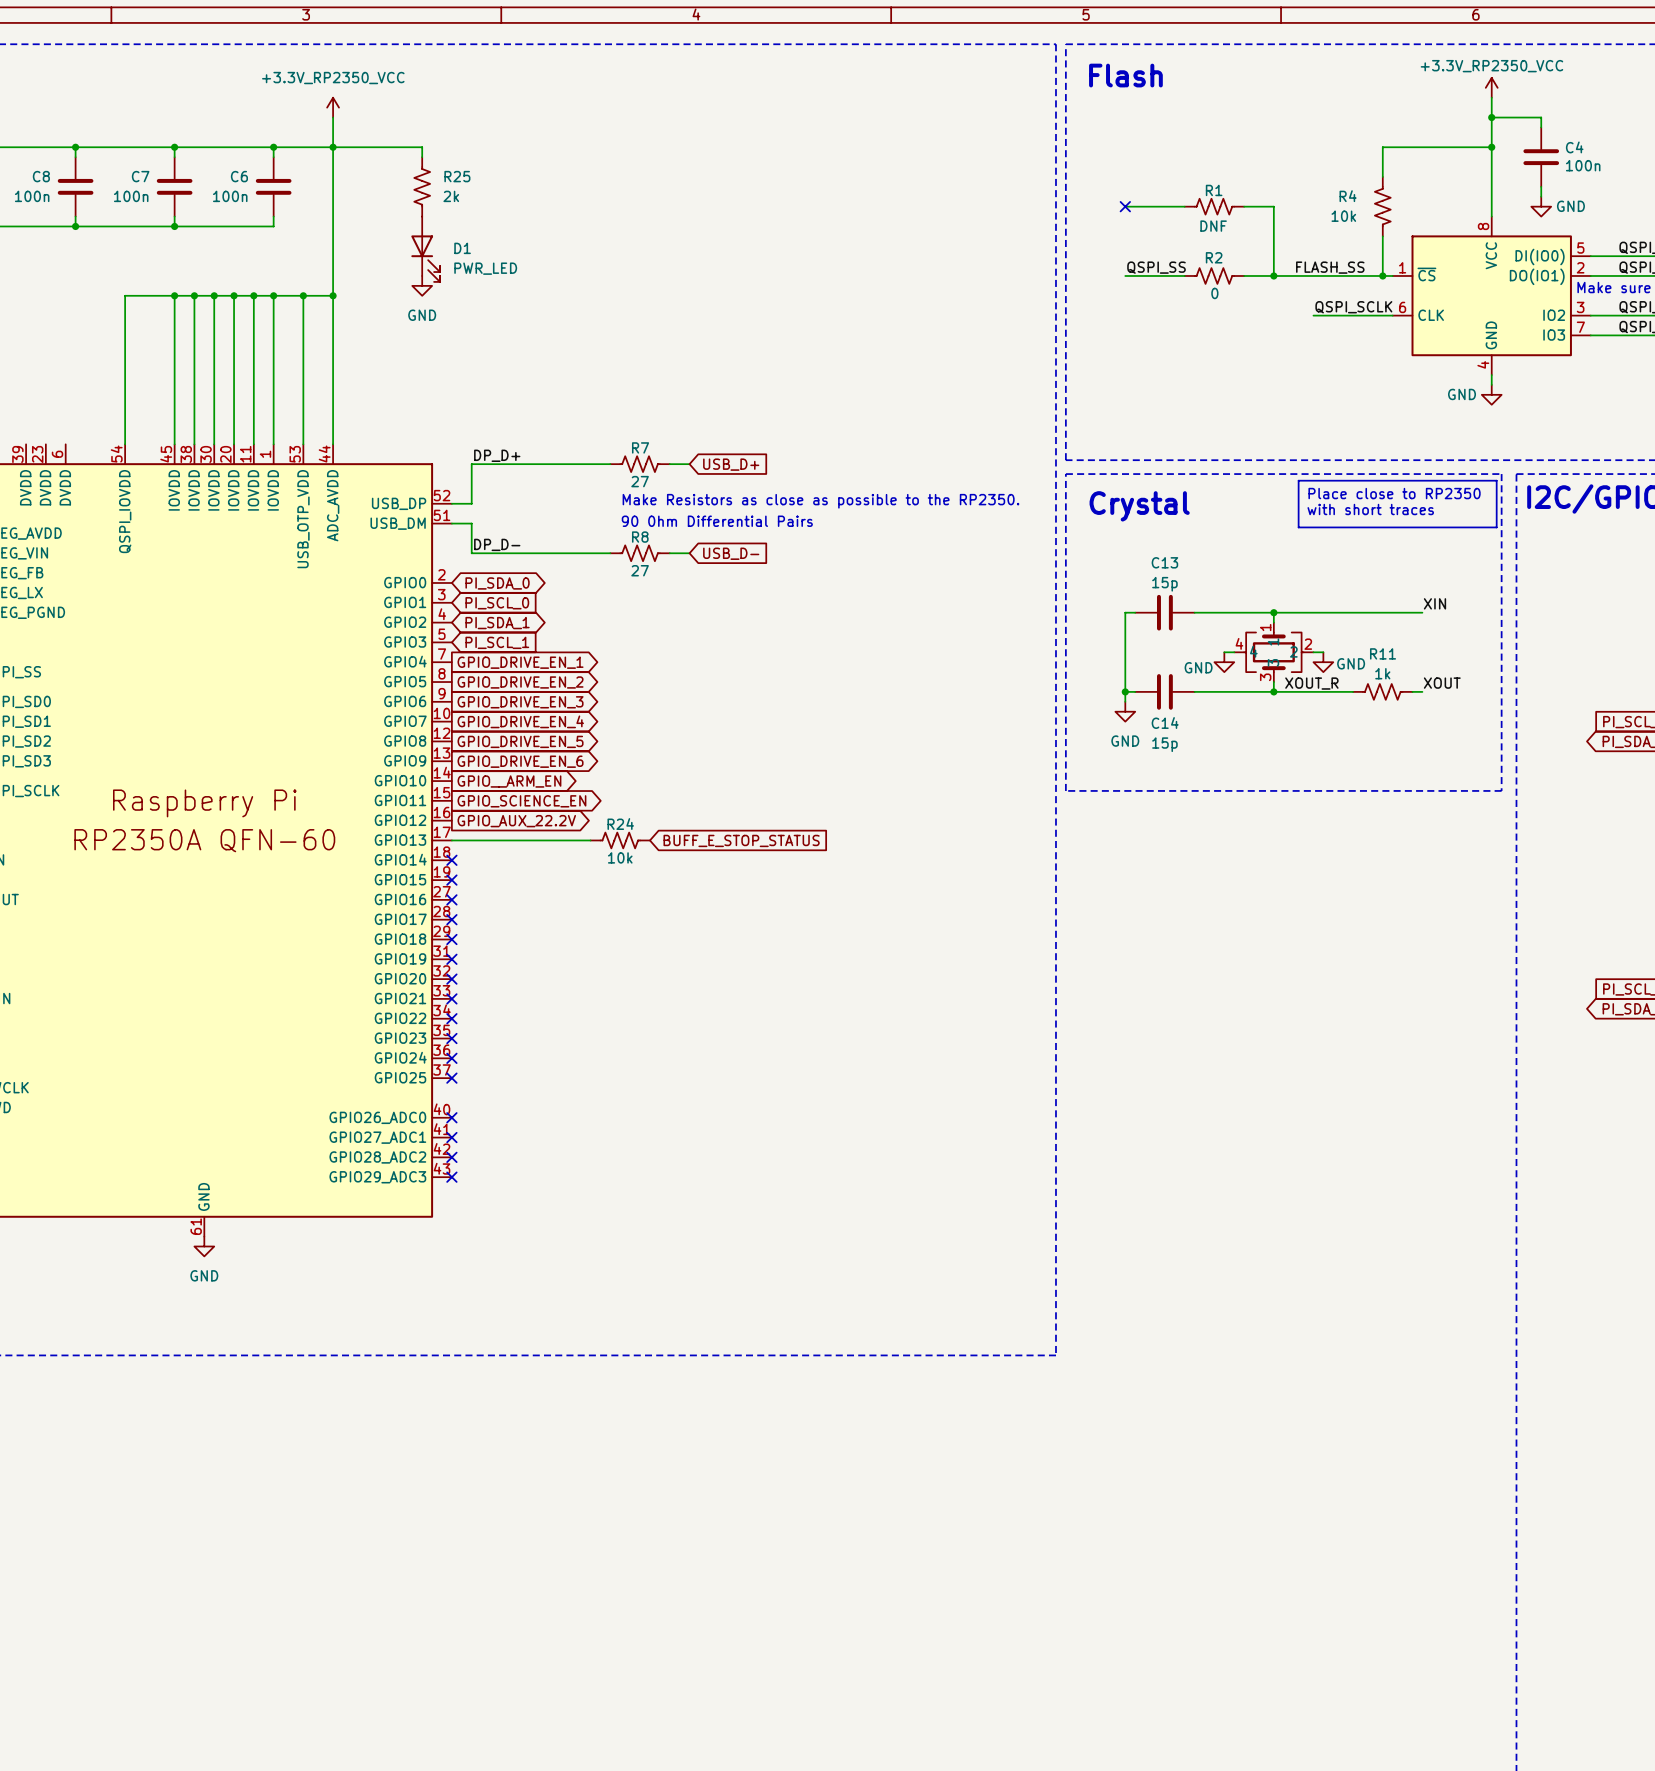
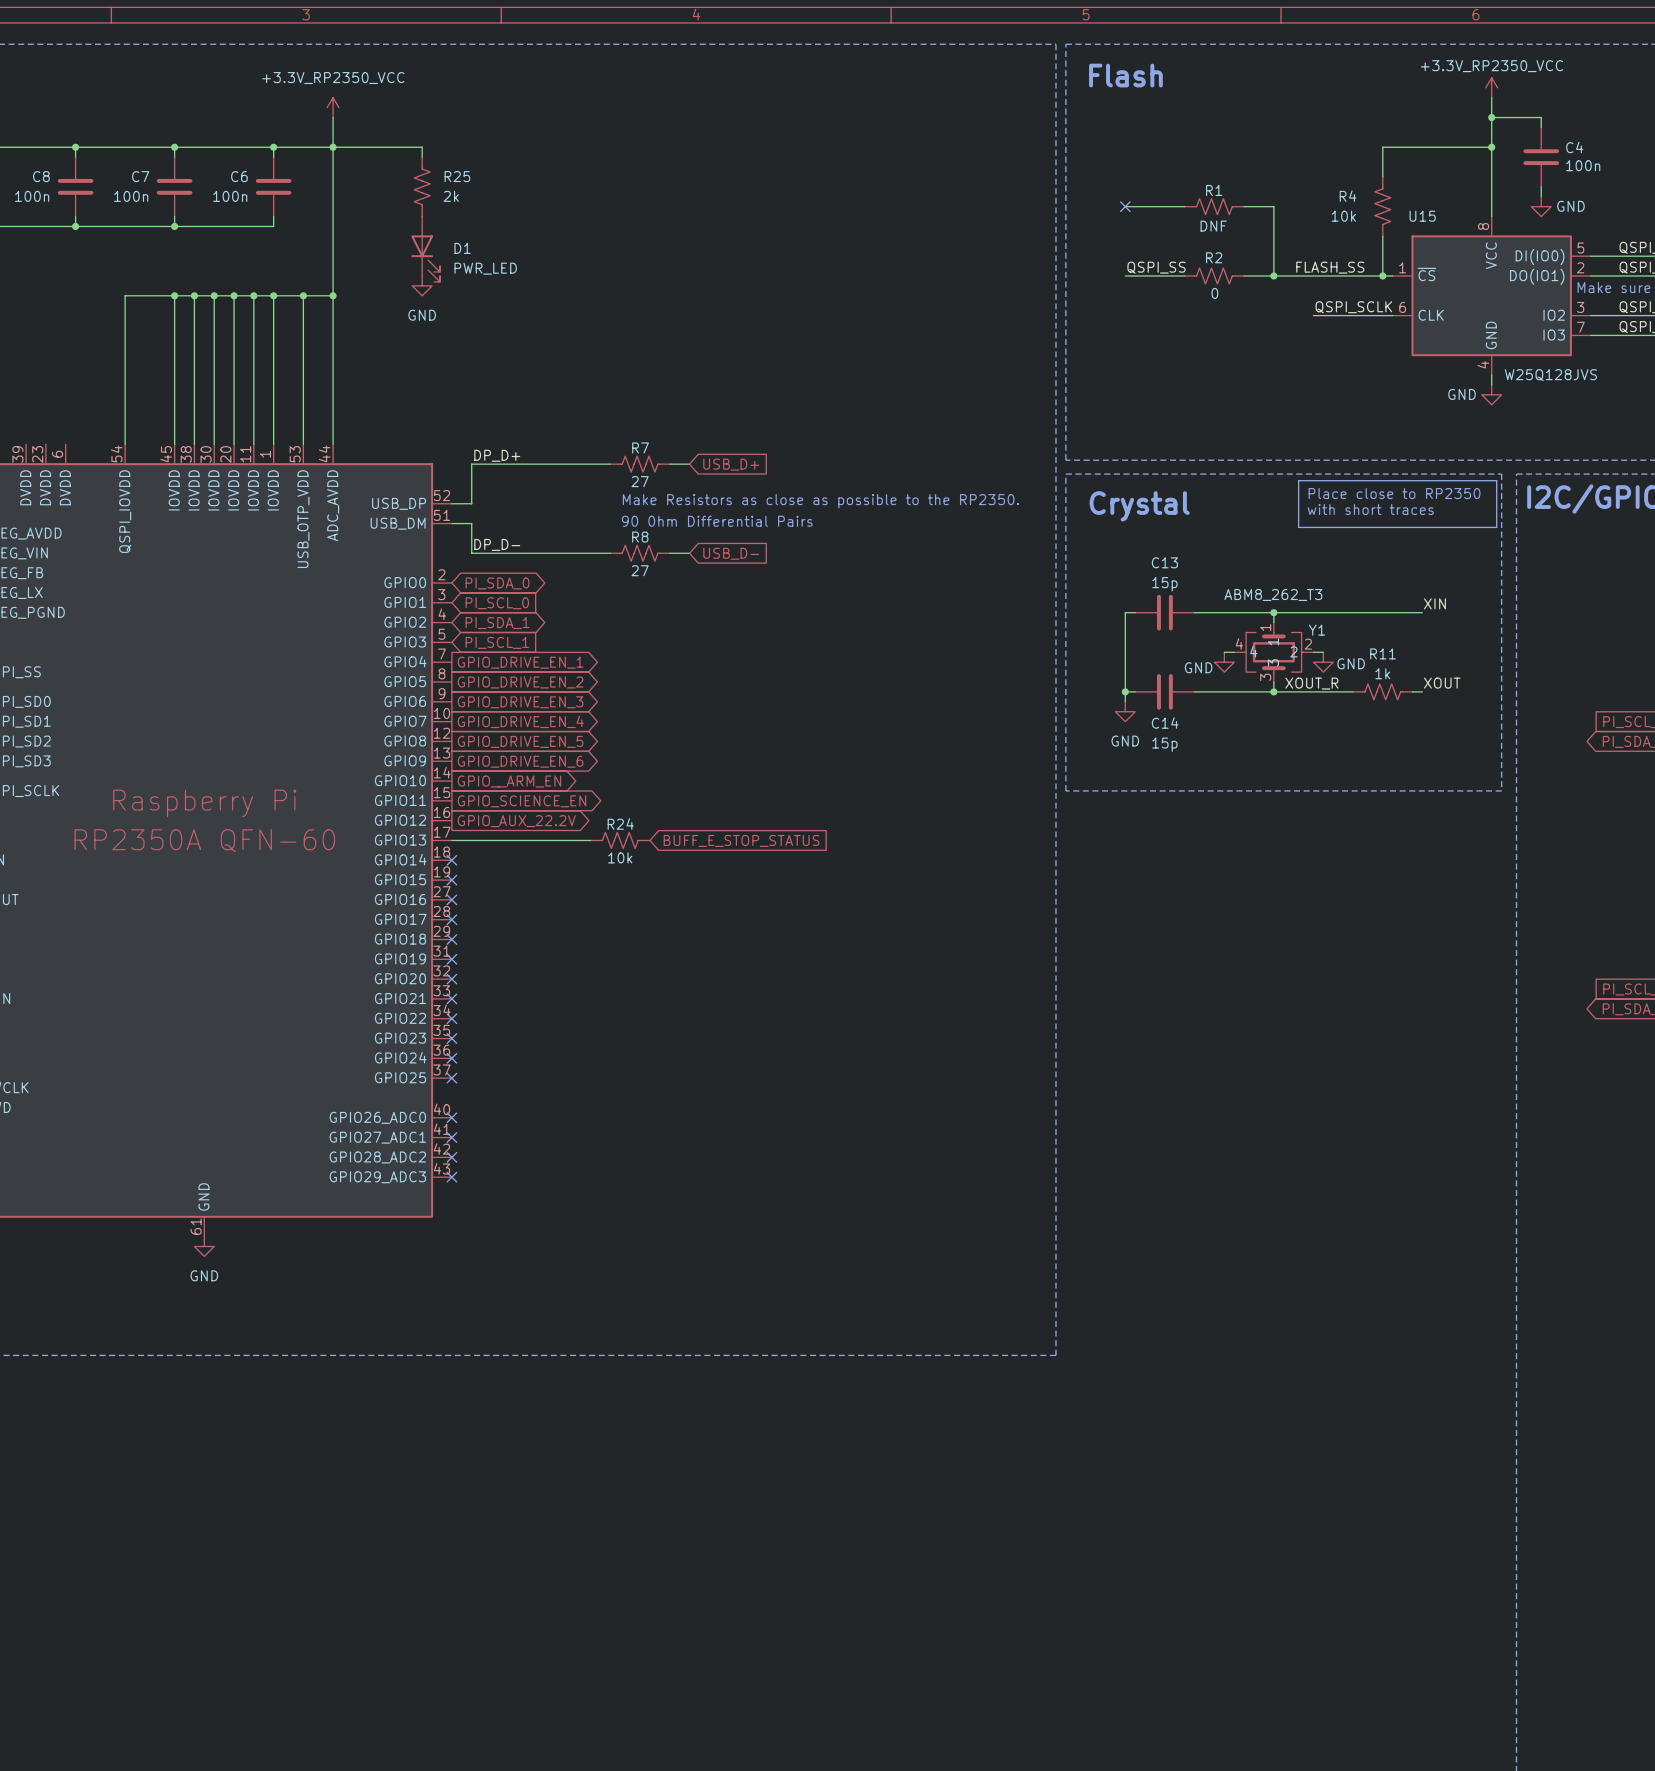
U15 name: none -> U15 (1422, 216)
U15 value: none -> W25Q128JVS (1550, 375)
Y1 value: none -> ABM8_262_T3 (1273, 594)
Y1 name: none -> Y1 (1316, 630)

